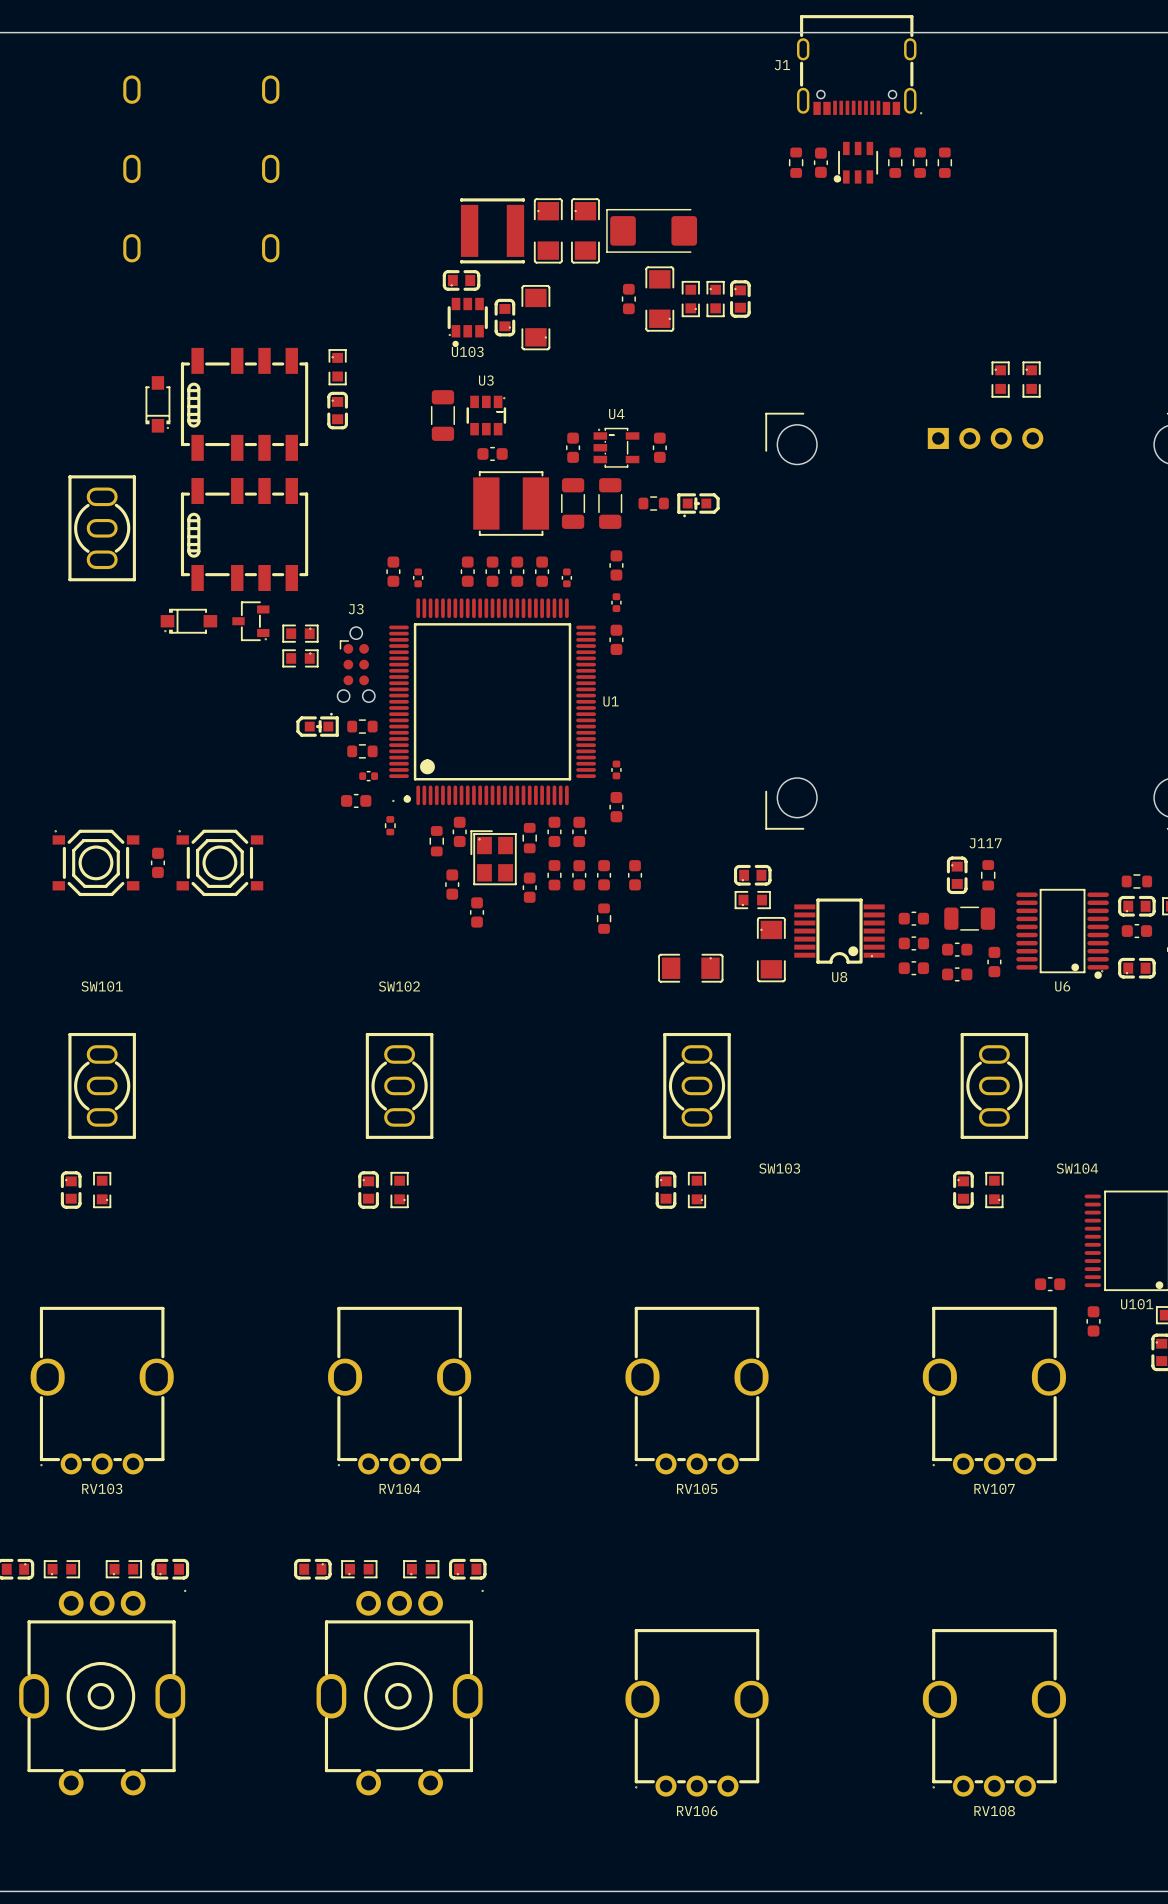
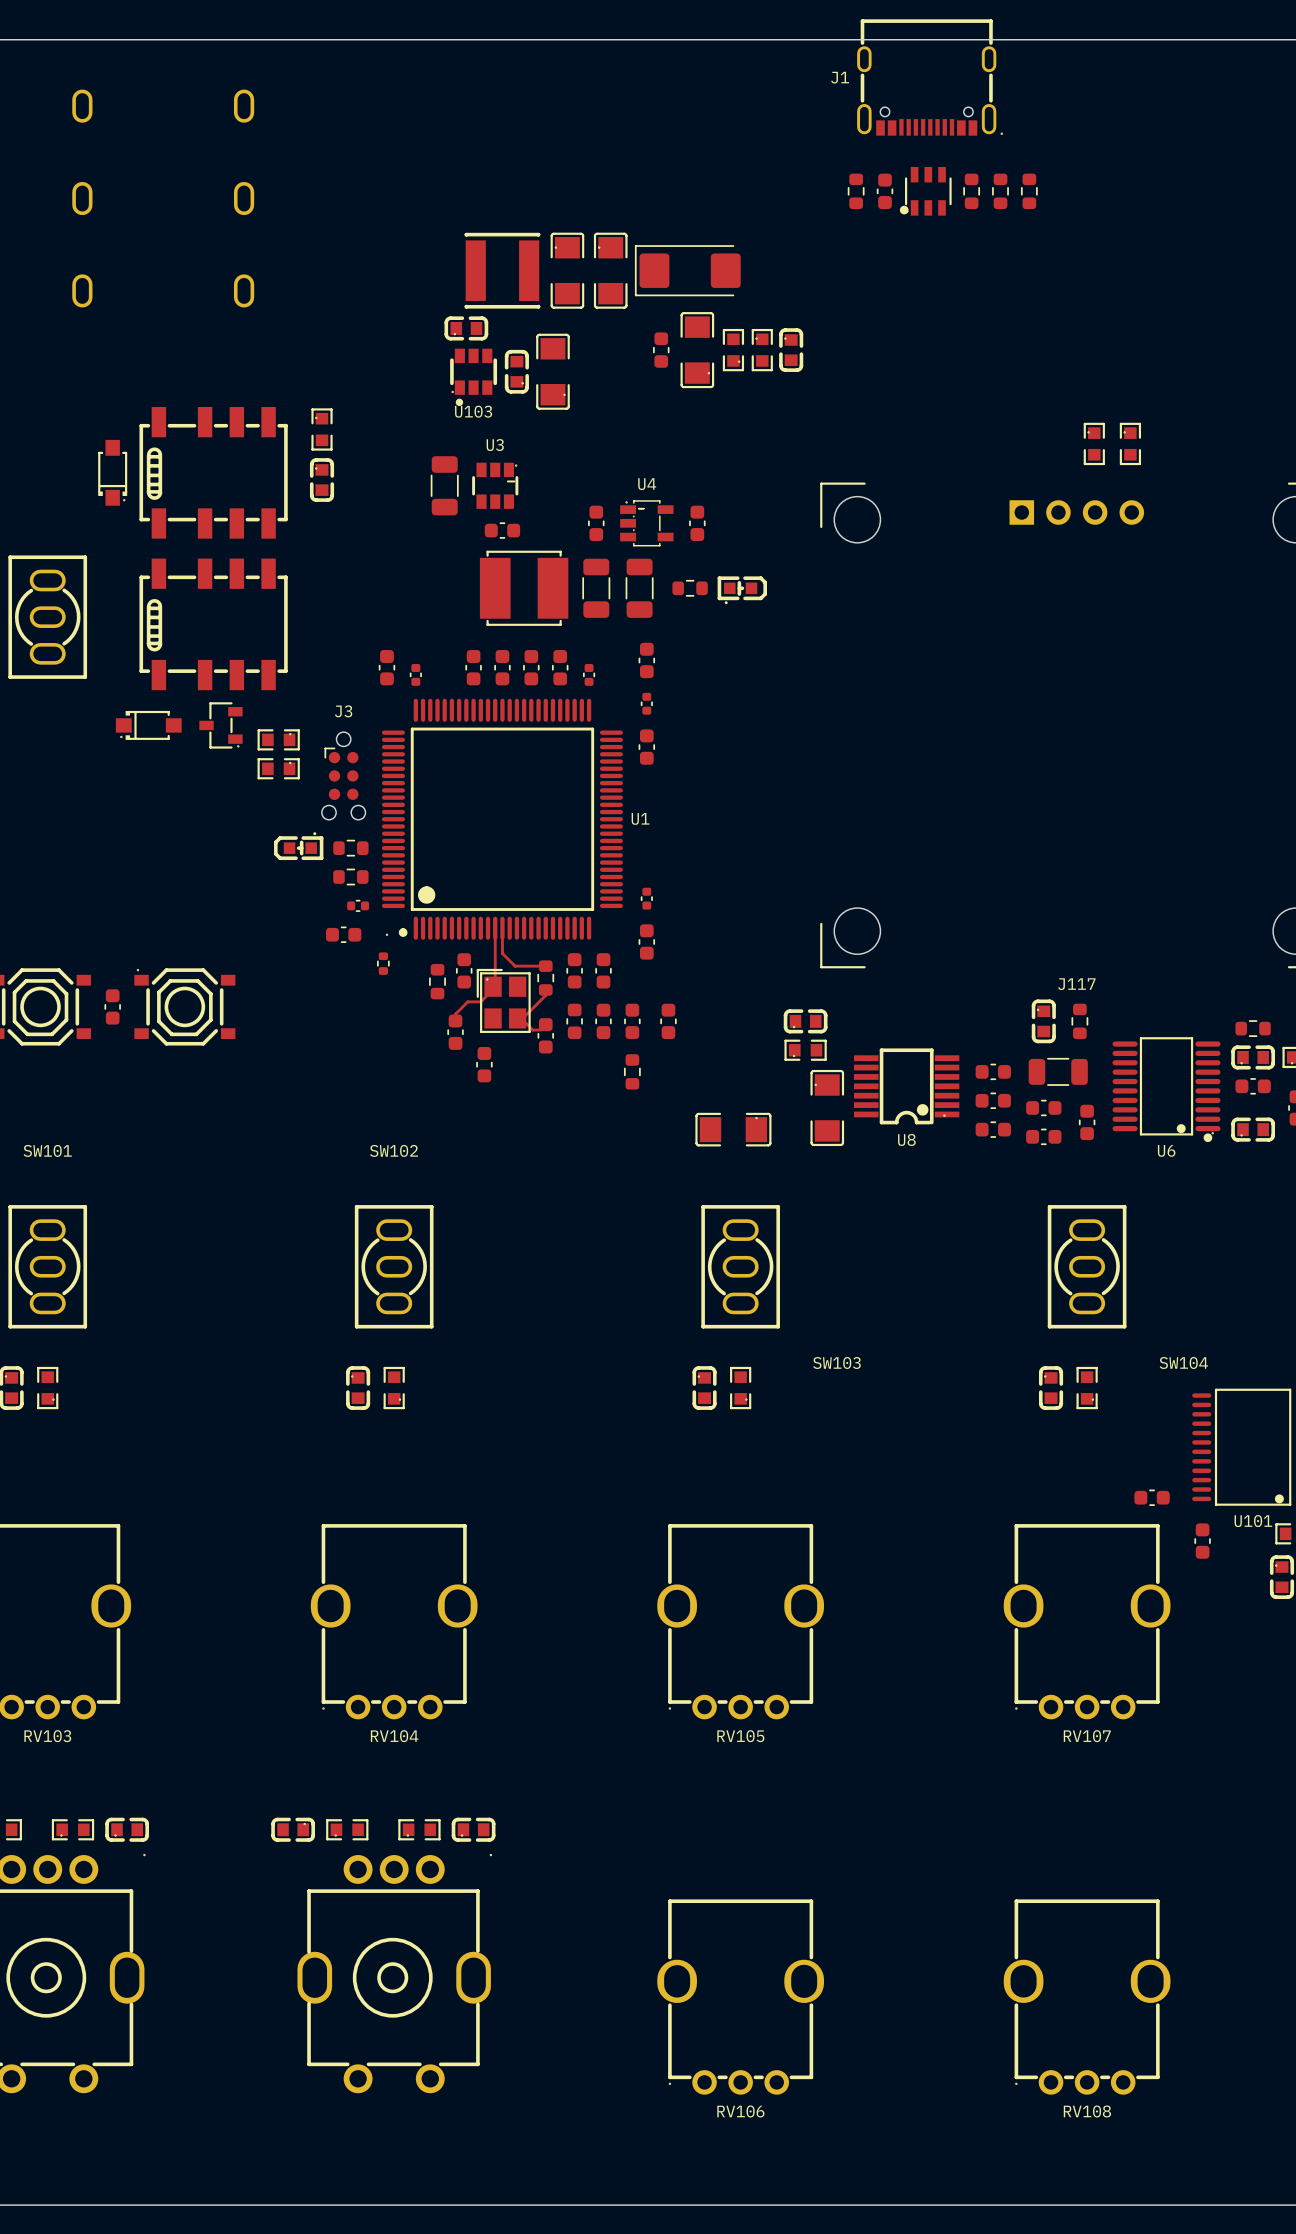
track: none -> (495, 937) (495, 981) (493, 983)
track: none -> (502, 937) (502, 953) (515, 966) (545, 966)
track: none -> (493, 989) (480, 1001) (467, 1001) (455, 1014) (455, 1021)
track: none -> (545, 989) (545, 995) (522, 1018)
track: none -> (525, 1022) (532, 1030) (541, 1030)

